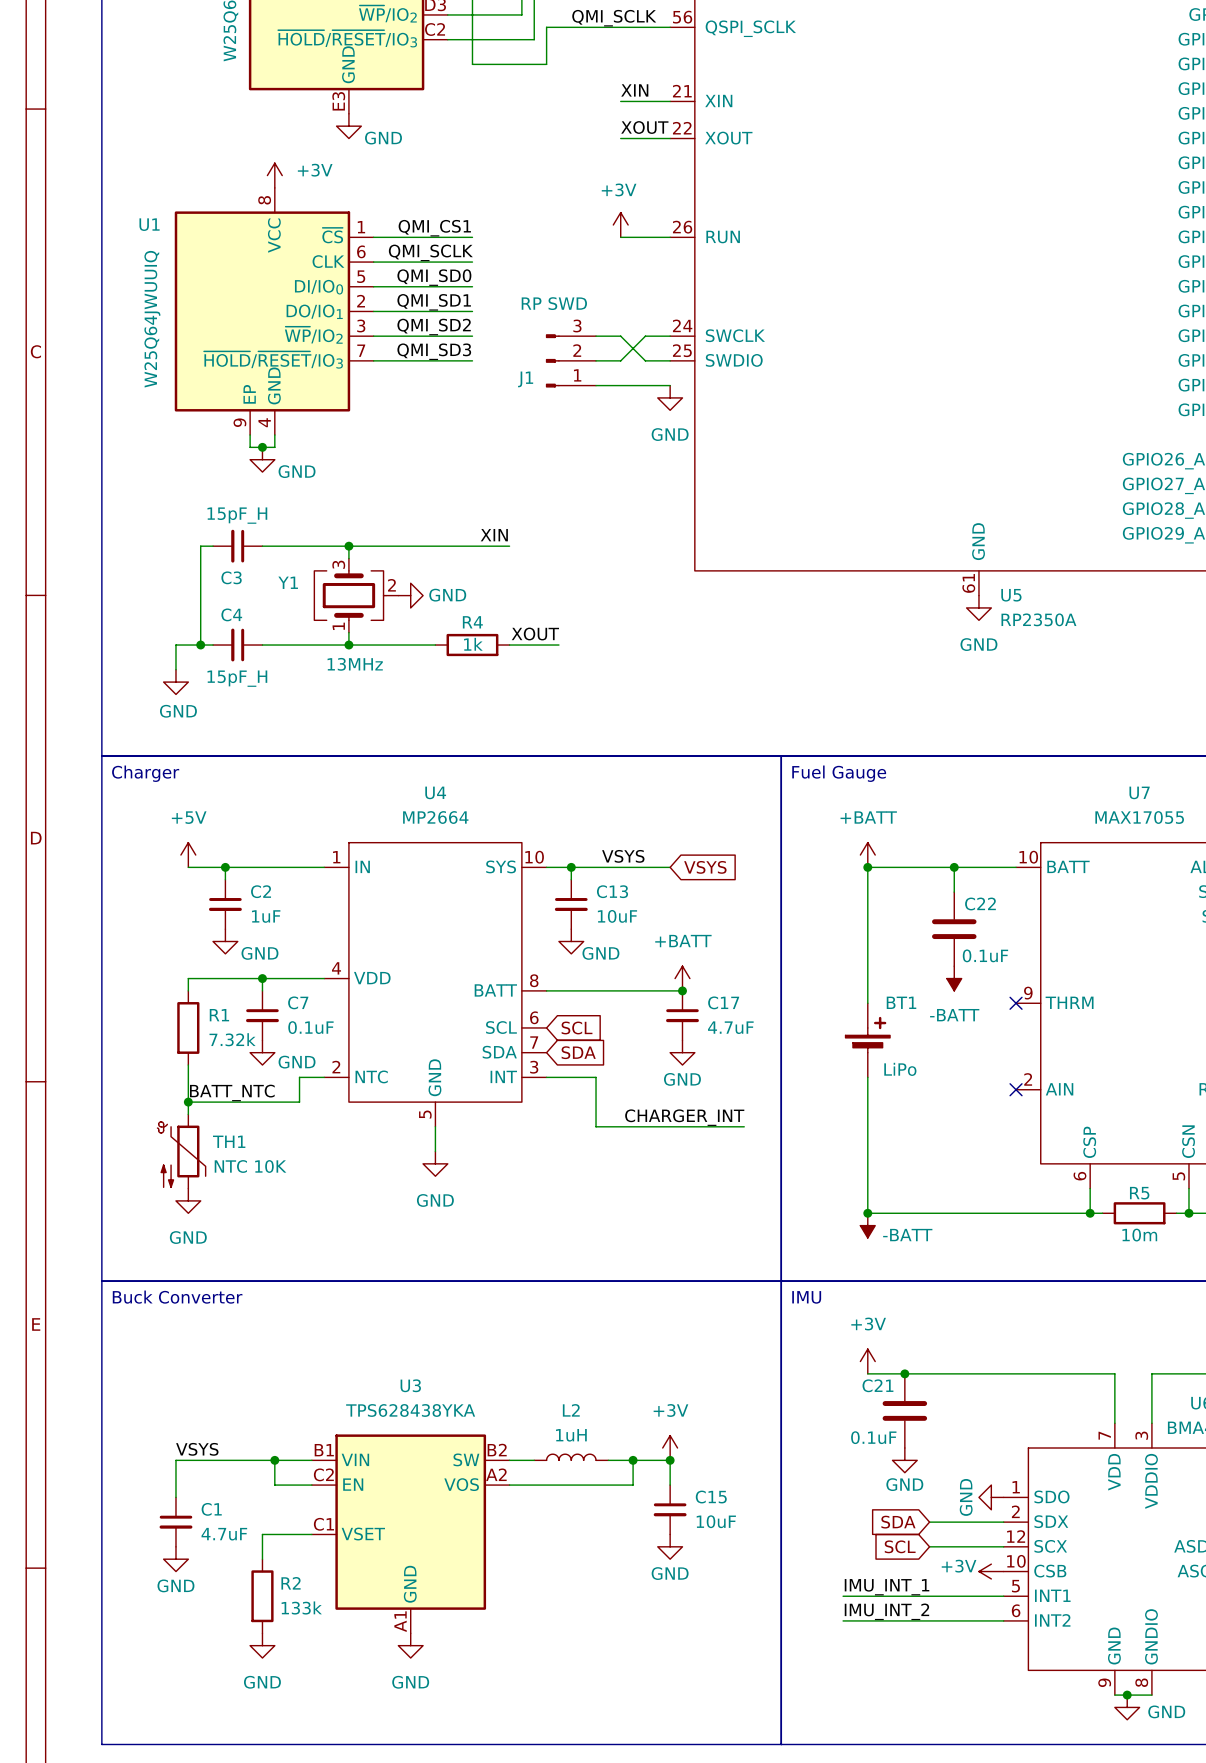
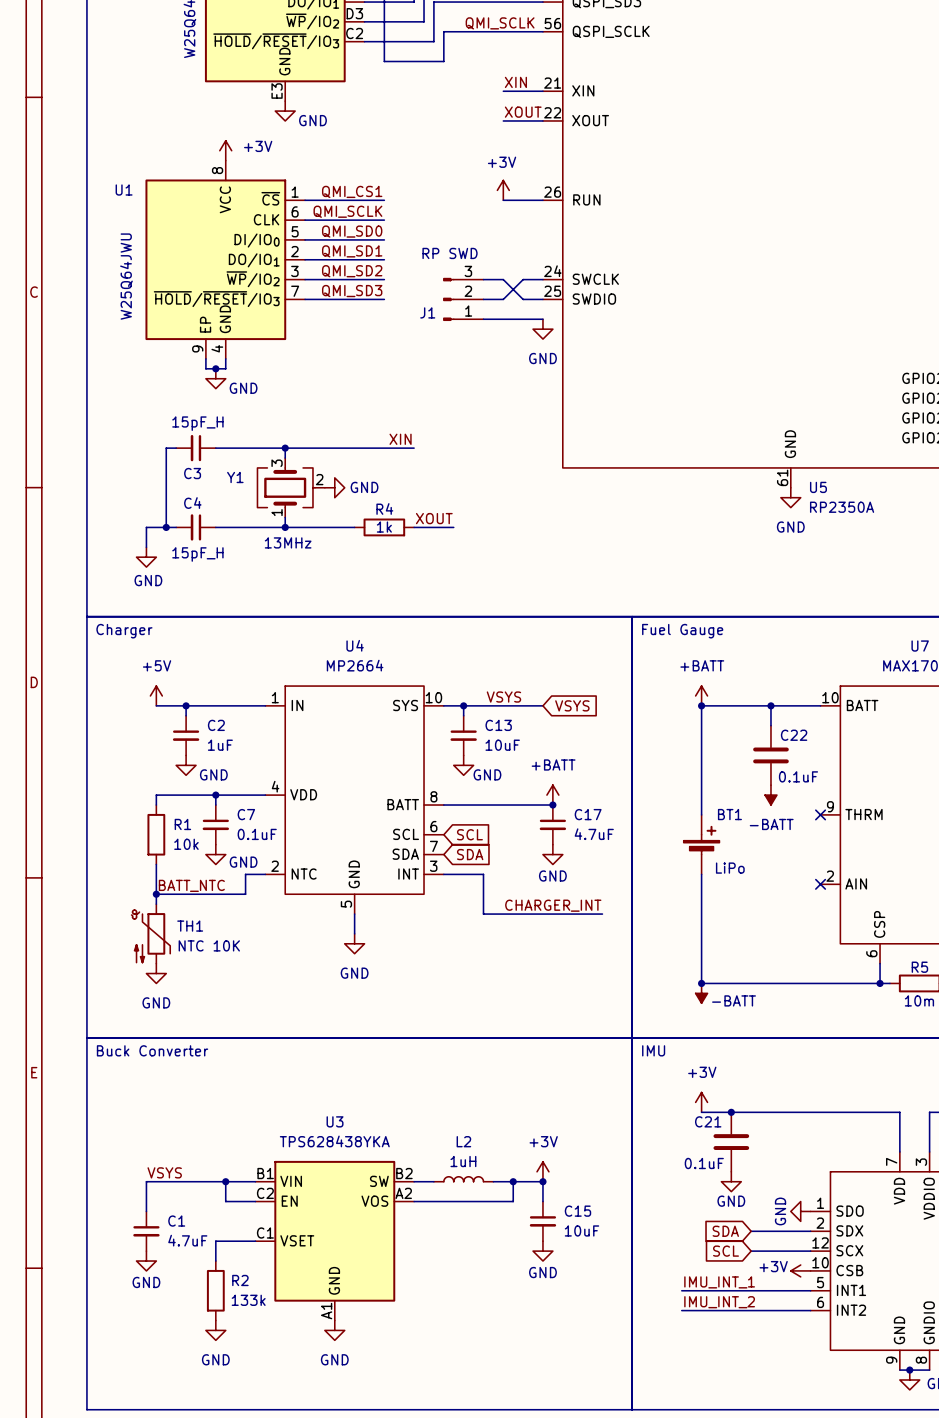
U1 value: W25Q64JWUUIQ (152, 319) -> W25Q64JWU (126, 276)
R1 value: 7.32k (232, 1039) -> 10k (186, 844)

